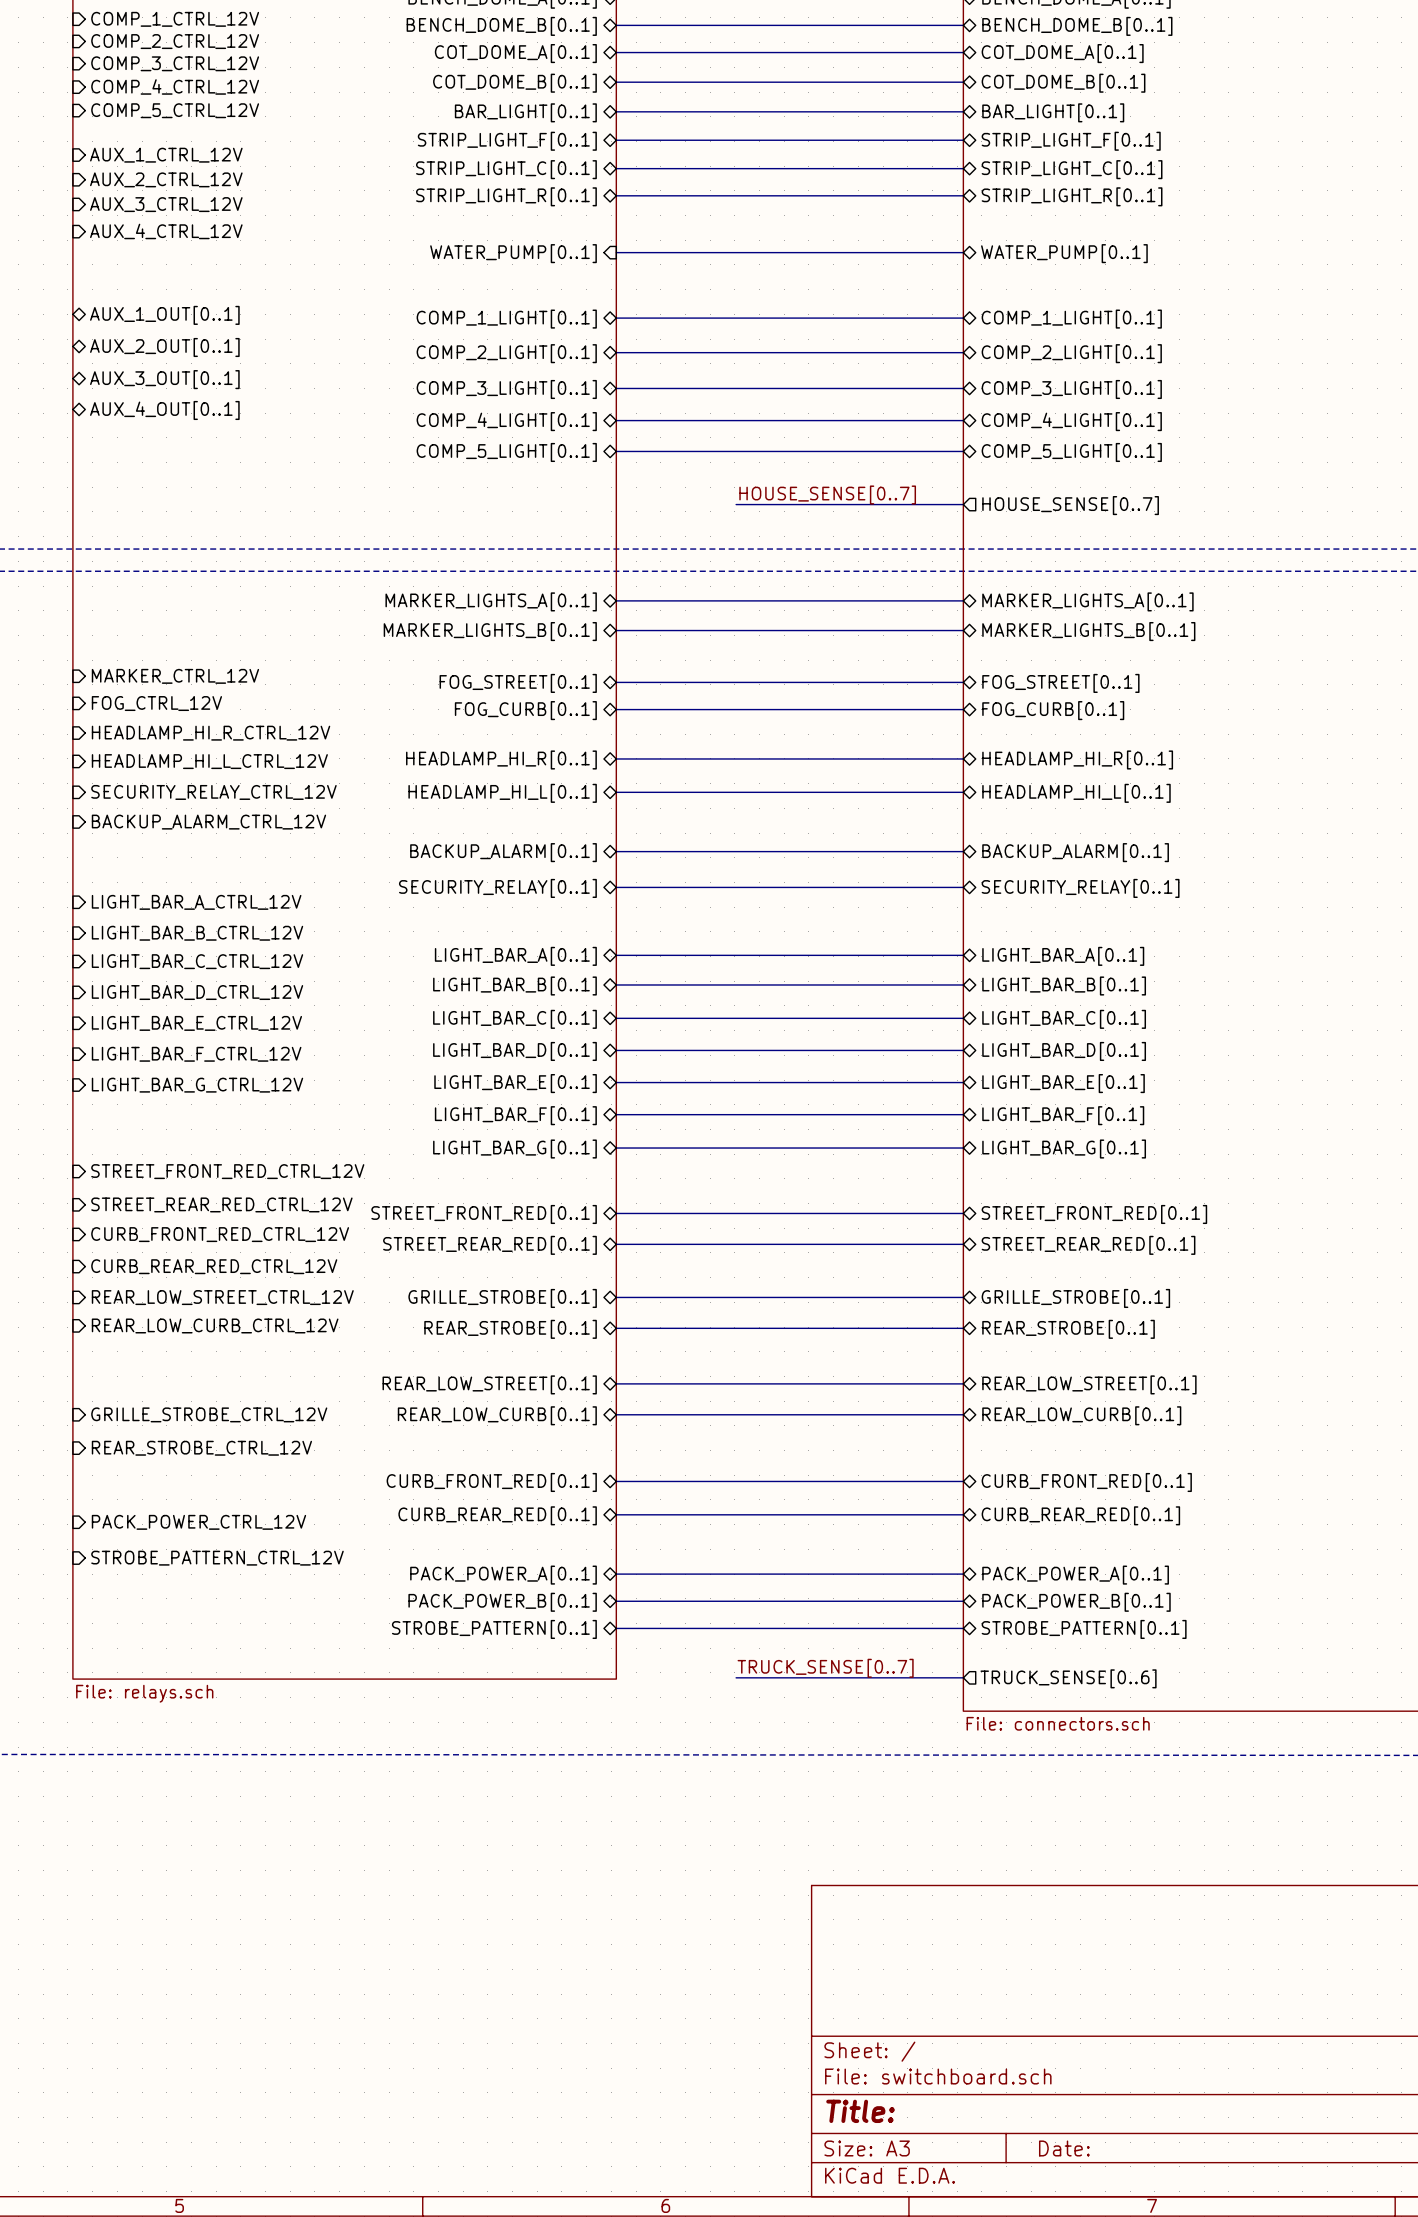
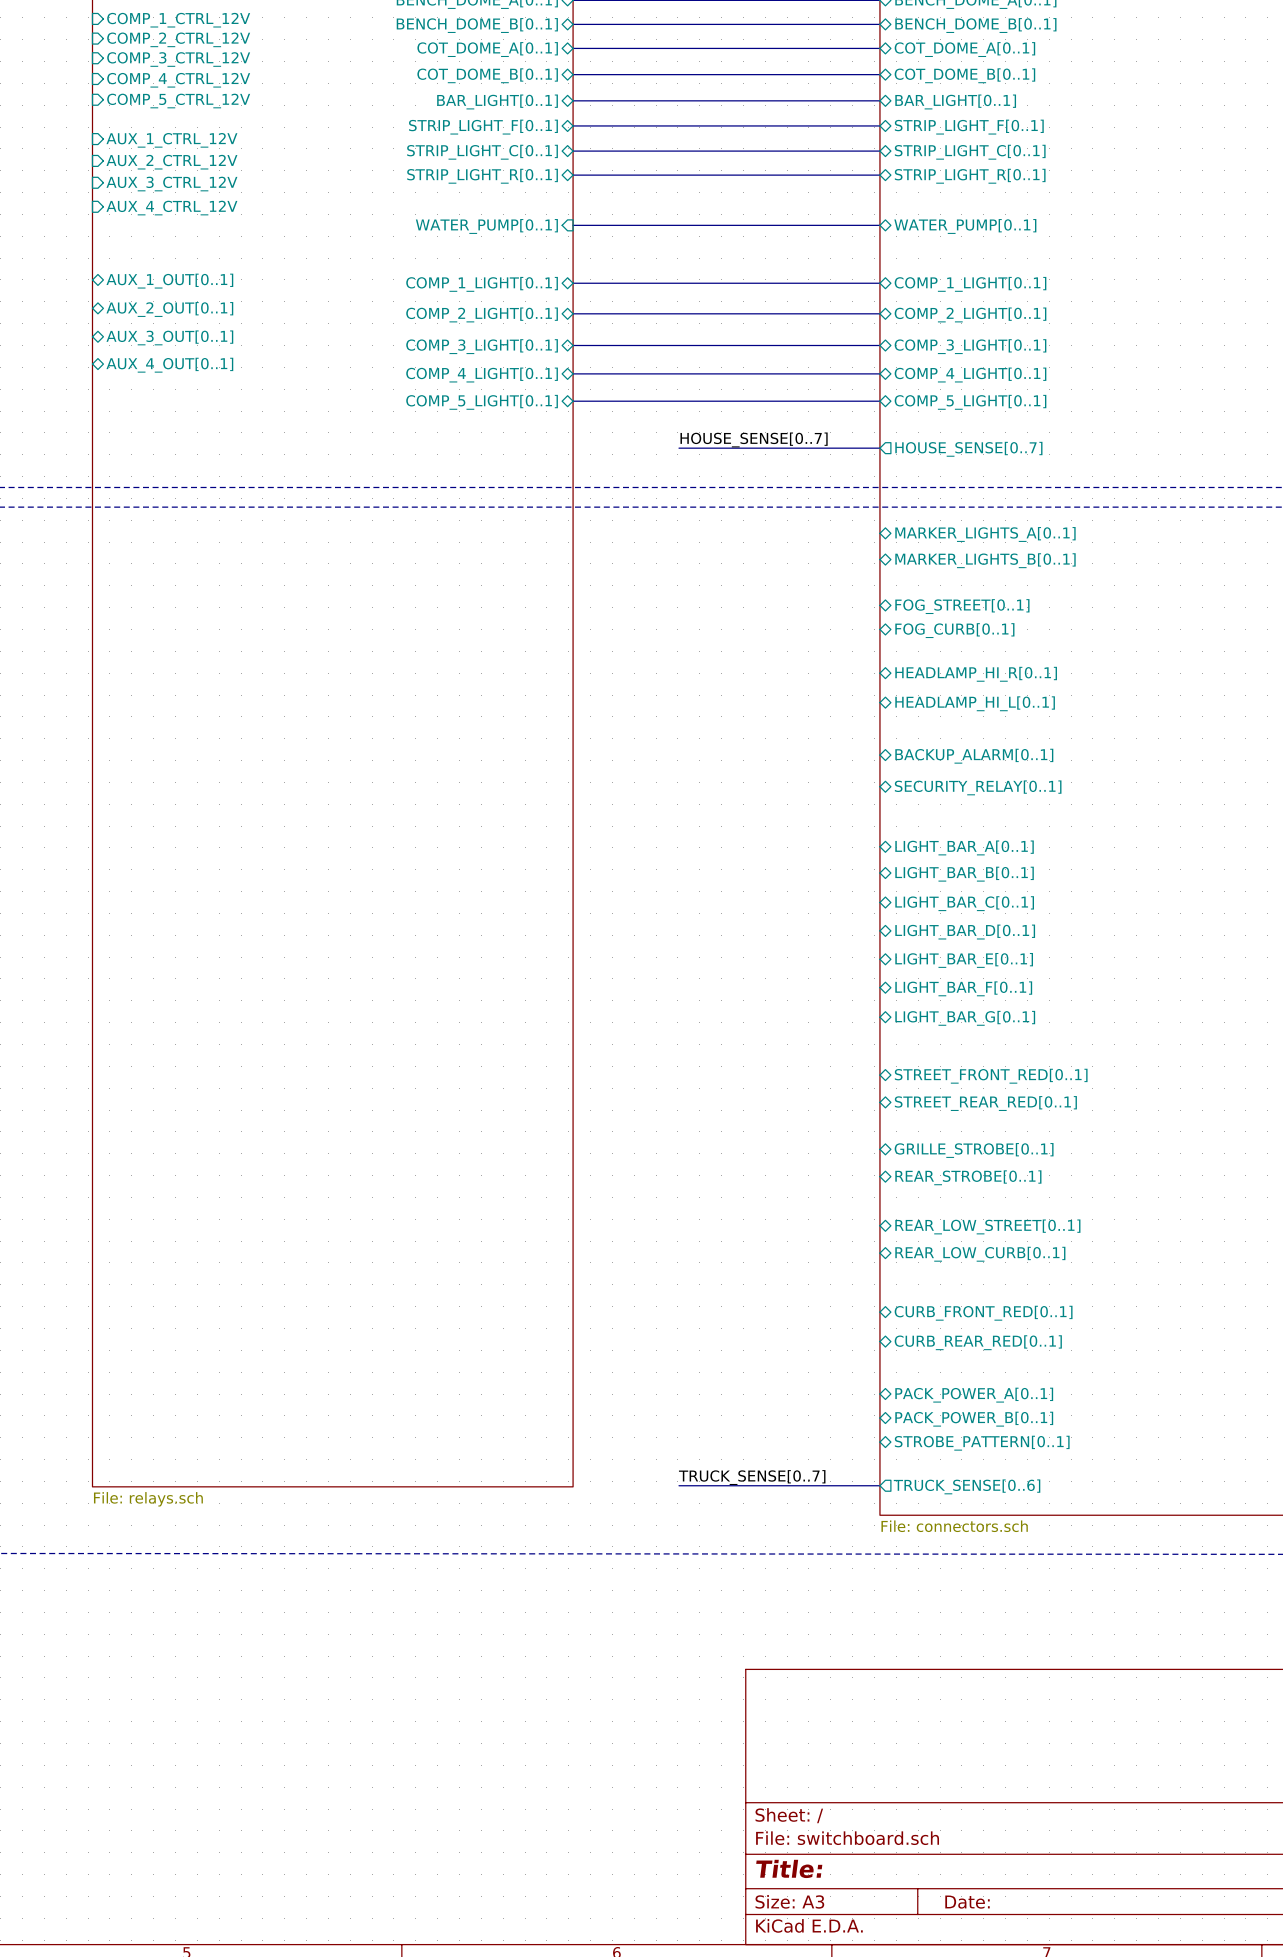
bus: (616, 600) (963, 600) -> none
sheet pin: MARKER_LIGHTS_A[0..1] (491, 601) -> none
bus: (616, 630) (963, 630) -> none
sheet pin: MARKER_LIGHTS_B[0..1] (490, 631) -> none
sheet pin: MARKER_CTRL_12V (175, 676) -> none
bus: (616, 682) (963, 682) -> none
sheet pin: FOG_STREET[0..1] (518, 683) -> none
sheet pin: FOG_CTRL_12V (156, 703) -> none
bus: (616, 709) (963, 709) -> none
sheet pin: FOG_CURB[0..1] (525, 710) -> none
sheet pin: HEADLAMP_HI_R_CTRL_12V (211, 733) -> none
bus: (616, 758) (963, 758) -> none
sheet pin: HEADLAMP_HI_R[0..1] (501, 759) -> none
sheet pin: HEADLAMP_HI_L_CTRL_12V (209, 761) -> none
sheet pin: SECURITY_RELAY_CTRL_12V (213, 792) -> none
bus: (616, 792) (963, 792) -> none
sheet pin: HEADLAMP_HI_L[0..1] (502, 793) -> none
sheet pin: BACKUP_ALARM_CTRL_12V (208, 822) -> none
bus: (616, 851) (963, 851) -> none
sheet pin: BACKUP_ALARM[0..1] (503, 852) -> none
bus: (616, 887) (963, 887) -> none
sheet pin: SECURITY_RELAY[0..1] (497, 888) -> none
sheet pin: LIGHT_BAR_A_CTRL_12V (196, 902) -> none
sheet pin: LIGHT_BAR_B_CTRL_12V (197, 933) -> none
bus: (616, 955) (963, 955) -> none
sheet pin: LIGHT_BAR_A[0..1] (515, 956) -> none
sheet pin: LIGHT_BAR_C_CTRL_12V (197, 961) -> none
bus: (616, 984) (963, 984) -> none
sheet pin: LIGHT_BAR_B[0..1] (514, 986) -> none
sheet pin: LIGHT_BAR_D_CTRL_12V (197, 992) -> none
bus: (616, 1018) (963, 1018) -> none
sheet pin: LIGHT_BAR_C[0..1] (514, 1019) -> none
sheet pin: LIGHT_BAR_E_CTRL_12V (196, 1023) -> none
bus: (616, 1050) (963, 1050) -> none
sheet pin: LIGHT_BAR_D[0..1] (514, 1051) -> none
sheet pin: LIGHT_BAR_F_CTRL_12V (196, 1054) -> none
bus: (616, 1082) (963, 1082) -> none
sheet pin: LIGHT_BAR_E[0..1] (515, 1083) -> none
sheet pin: LIGHT_BAR_G_CTRL_12V (197, 1085) -> none
bus: (616, 1114) (963, 1114) -> none
sheet pin: LIGHT_BAR_F[0..1] (515, 1115) -> none
bus: (616, 1148) (963, 1148) -> none
sheet pin: LIGHT_BAR_G[0..1] (514, 1149) -> none
sheet pin: STREET_FRONT_RED_CTRL_12V (227, 1171) -> none
sheet pin: STREET_REAR_RED_CTRL_12V (221, 1204) -> none
bus: (616, 1213) (963, 1213) -> none
sheet pin: STREET_FRONT_RED[0..1] (484, 1214) -> none
sheet pin: CURB_FRONT_RED_CTRL_12V (220, 1234) -> none
bus: (616, 1244) (963, 1244) -> none
sheet pin: STREET_REAR_RED[0..1] (489, 1245) -> none
sheet pin: CURB_REAR_RED_CTRL_12V (214, 1266) -> none
sheet pin: REAR_LOW_STREET_CTRL_12V (222, 1297) -> none
bus: (616, 1297) (963, 1297) -> none
sheet pin: GRILLE_STROBE[0..1] (502, 1298) -> none
sheet pin: REAR_LOW_CURB_CTRL_12V (215, 1325) -> none
bus: (616, 1328) (963, 1328) -> none
sheet pin: REAR_STROBE[0..1] (510, 1329) -> none
bus: (616, 1383) (963, 1383) -> none
sheet pin: REAR_LOW_STREET[0..1] (489, 1384) -> none
sheet pin: GRILLE_STROBE_CTRL_12V (209, 1414) -> none
bus: (616, 1414) (963, 1414) -> none
sheet pin: REAR_LOW_CURB[0..1] (497, 1415) -> none
sheet pin: REAR_STROBE_CTRL_12V (201, 1448) -> none
bus: (616, 1481) (963, 1481) -> none
sheet pin: CURB_FRONT_RED[0..1] (491, 1482) -> none
bus: (616, 1514) (963, 1514) -> none
sheet pin: CURB_REAR_RED[0..1] (497, 1515) -> none
sheet pin: PACK_POWER_CTRL_12V (198, 1522) -> none
sheet pin: STROBE_PATTERN_CTRL_12V (217, 1558) -> none
bus: (616, 1574) (963, 1574) -> none
sheet pin: PACK_POWER_A[0..1] (503, 1575) -> none
bus: (616, 1601) (963, 1601) -> none
sheet pin: PACK_POWER_B[0..1] (502, 1602) -> none
bus: (616, 1628) (963, 1628) -> none
sheet pin: STROBE_PATTERN[0..1] (494, 1629) -> none

